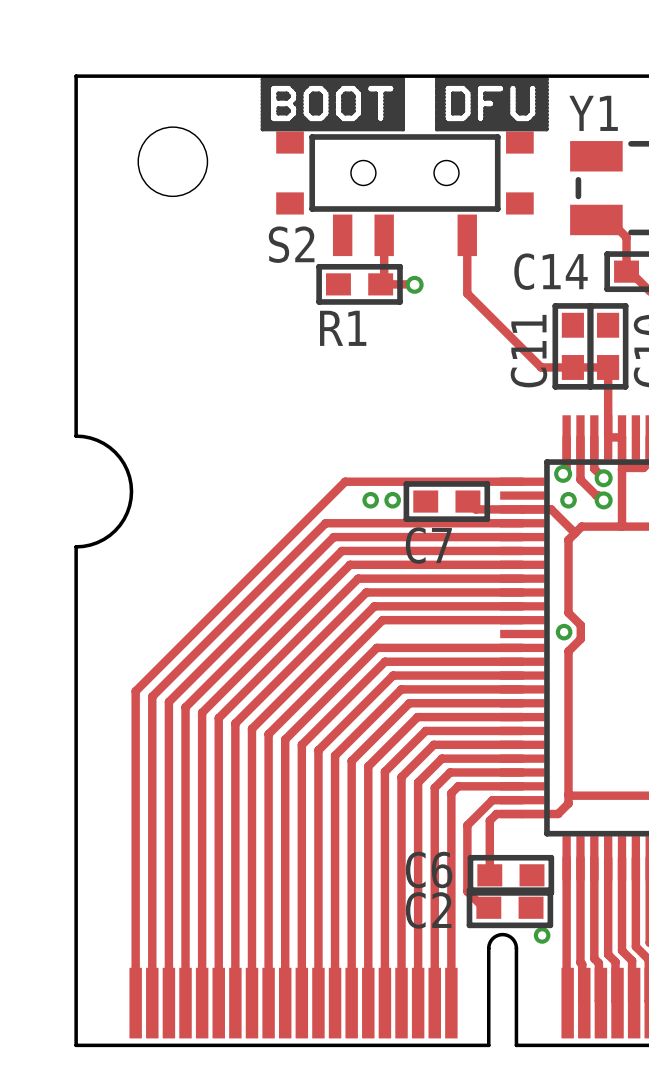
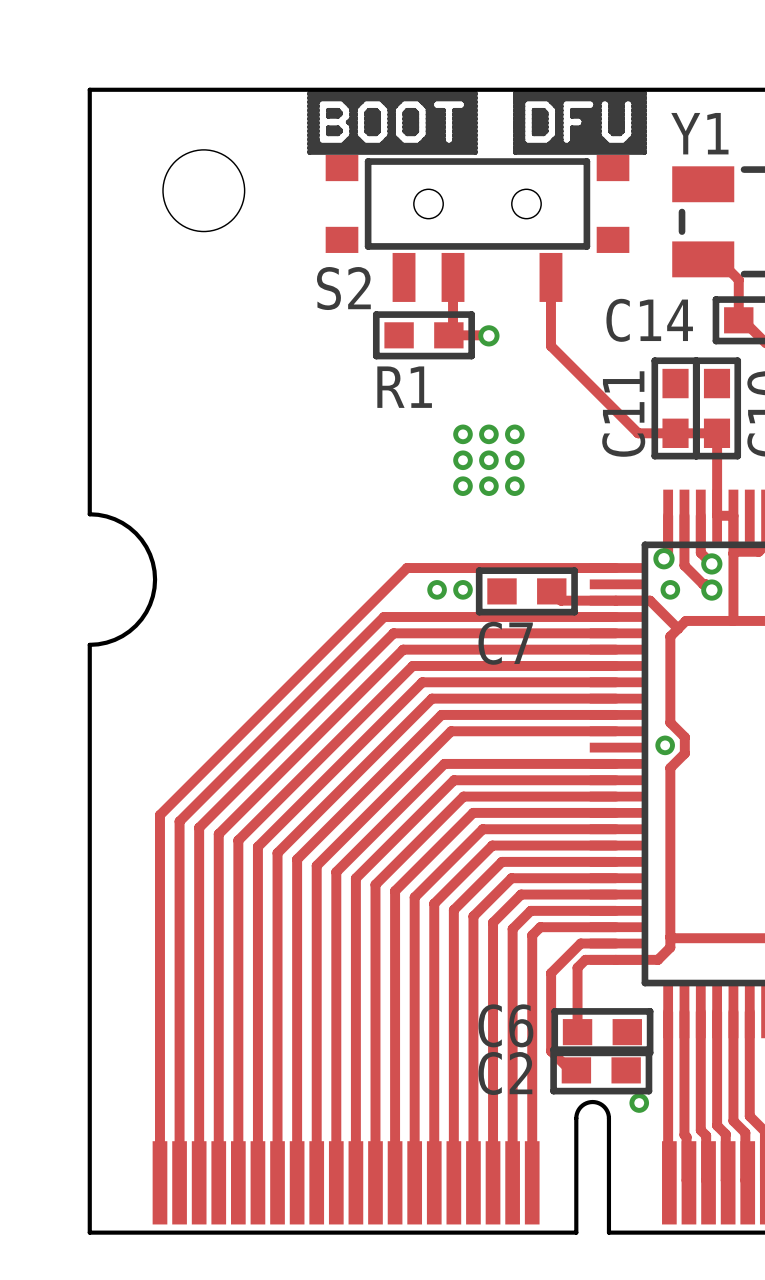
via: none -> (462, 434)
via: none -> (488, 434)
via: none -> (514, 434)
via: none -> (462, 460)
via: none -> (488, 460)
via: none -> (514, 460)
via: none -> (462, 486)
via: none -> (488, 486)
via: none -> (514, 486)

